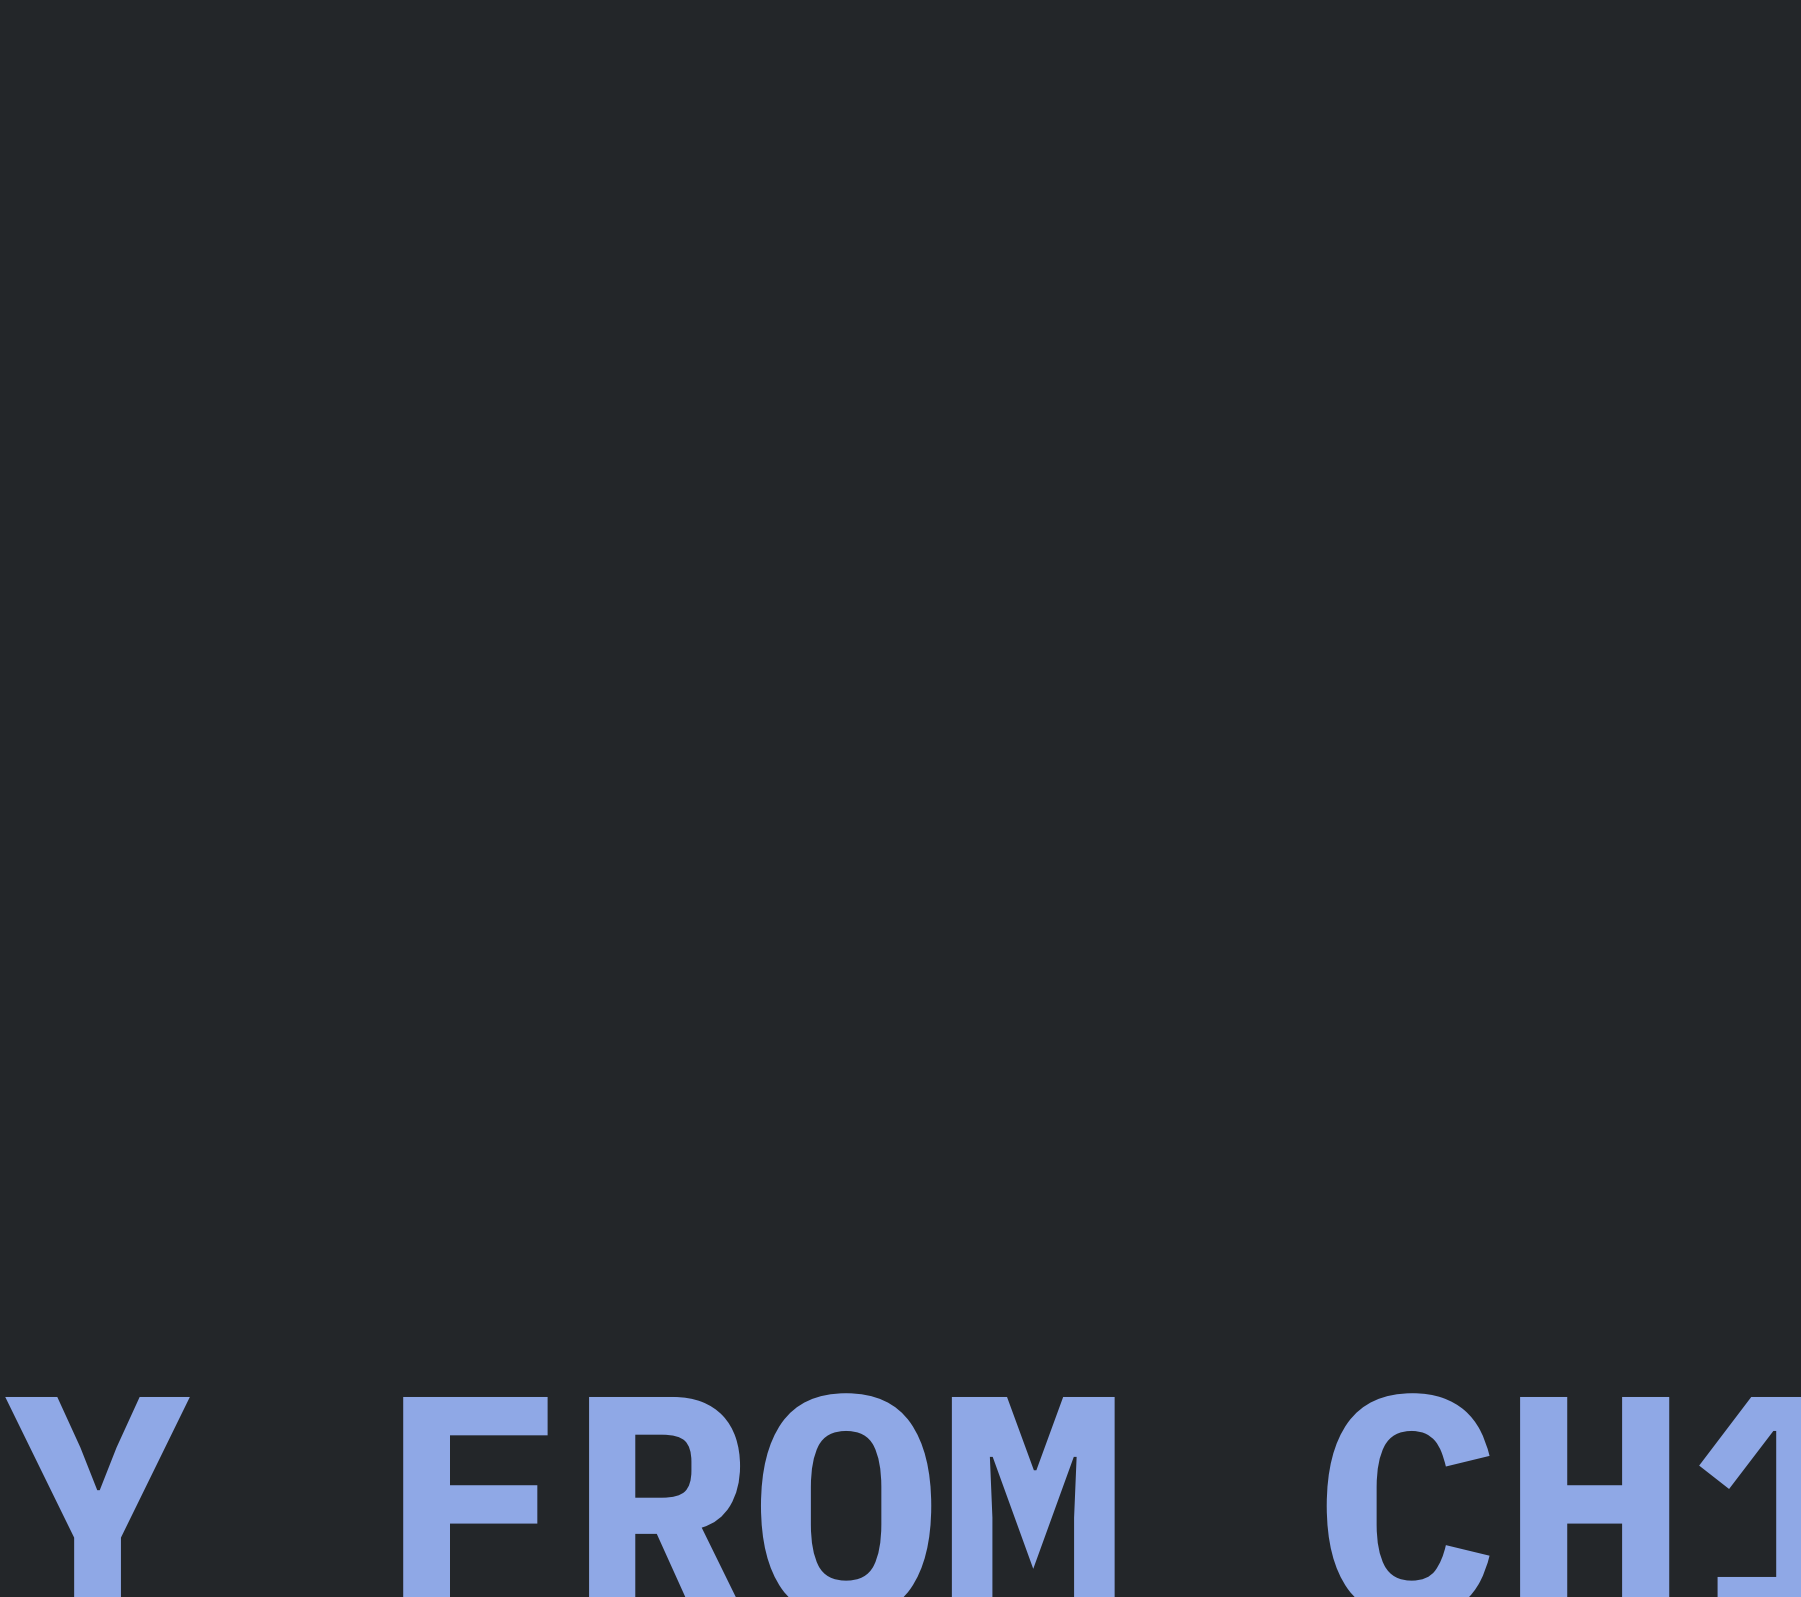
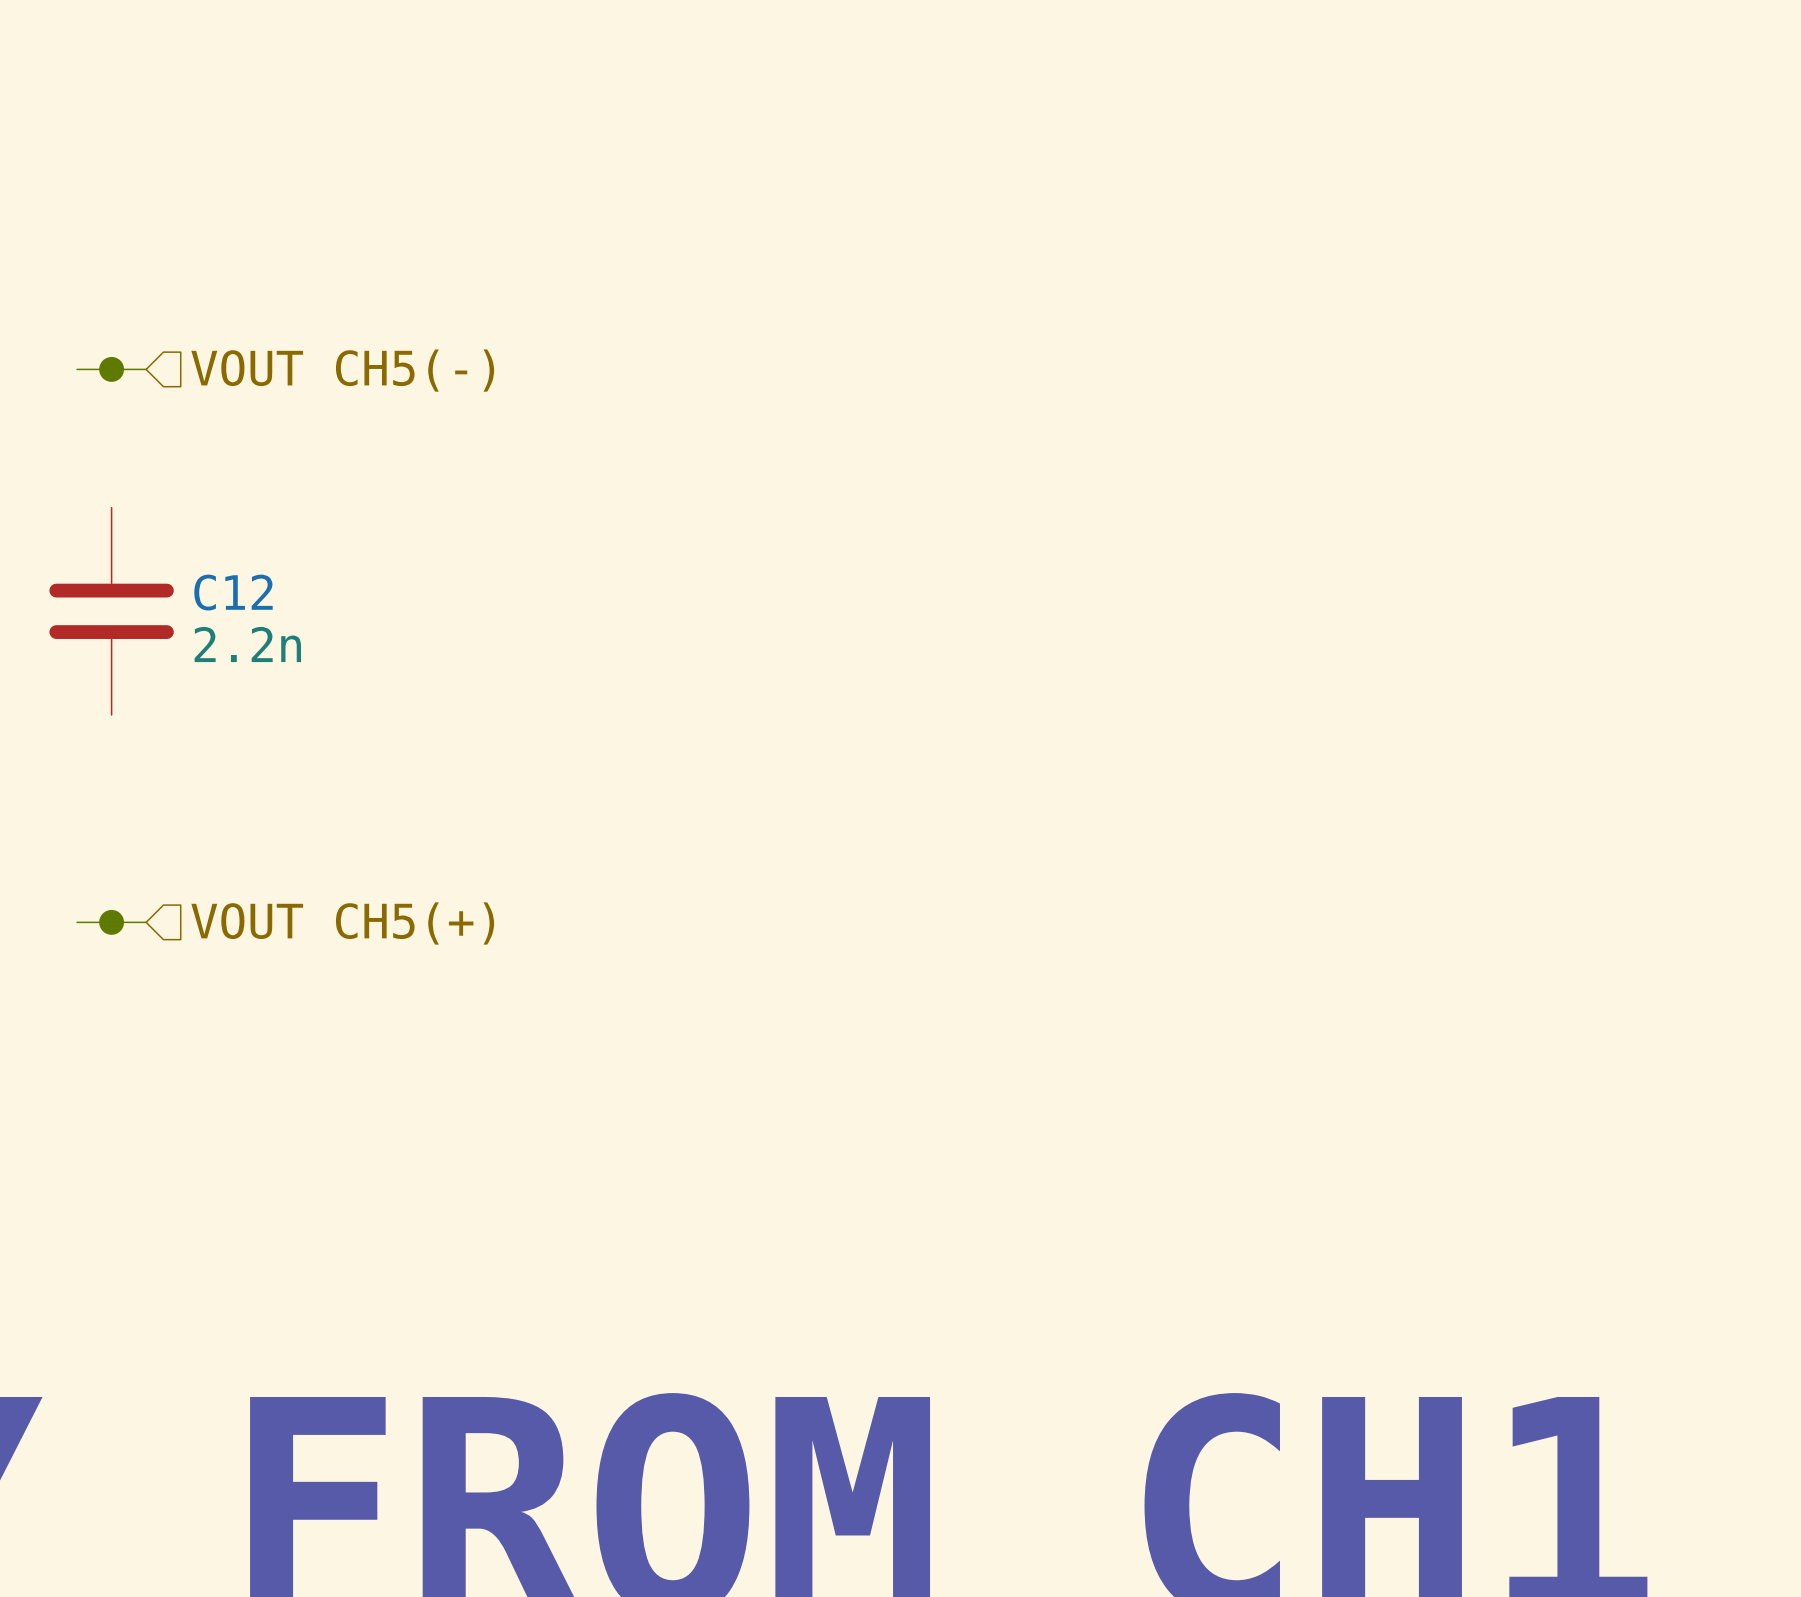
wire: none -> (77, 369) (146, 369)
junction: none -> (111, 369)
hierarchical label: none -> VOUT CH5(-) (342, 370)
C12: none -> 2.2n (111, 611)
wire: none -> (77, 922) (146, 922)
junction: none -> (111, 922)
hierarchical label: none -> VOUT CH5(+) (342, 923)

